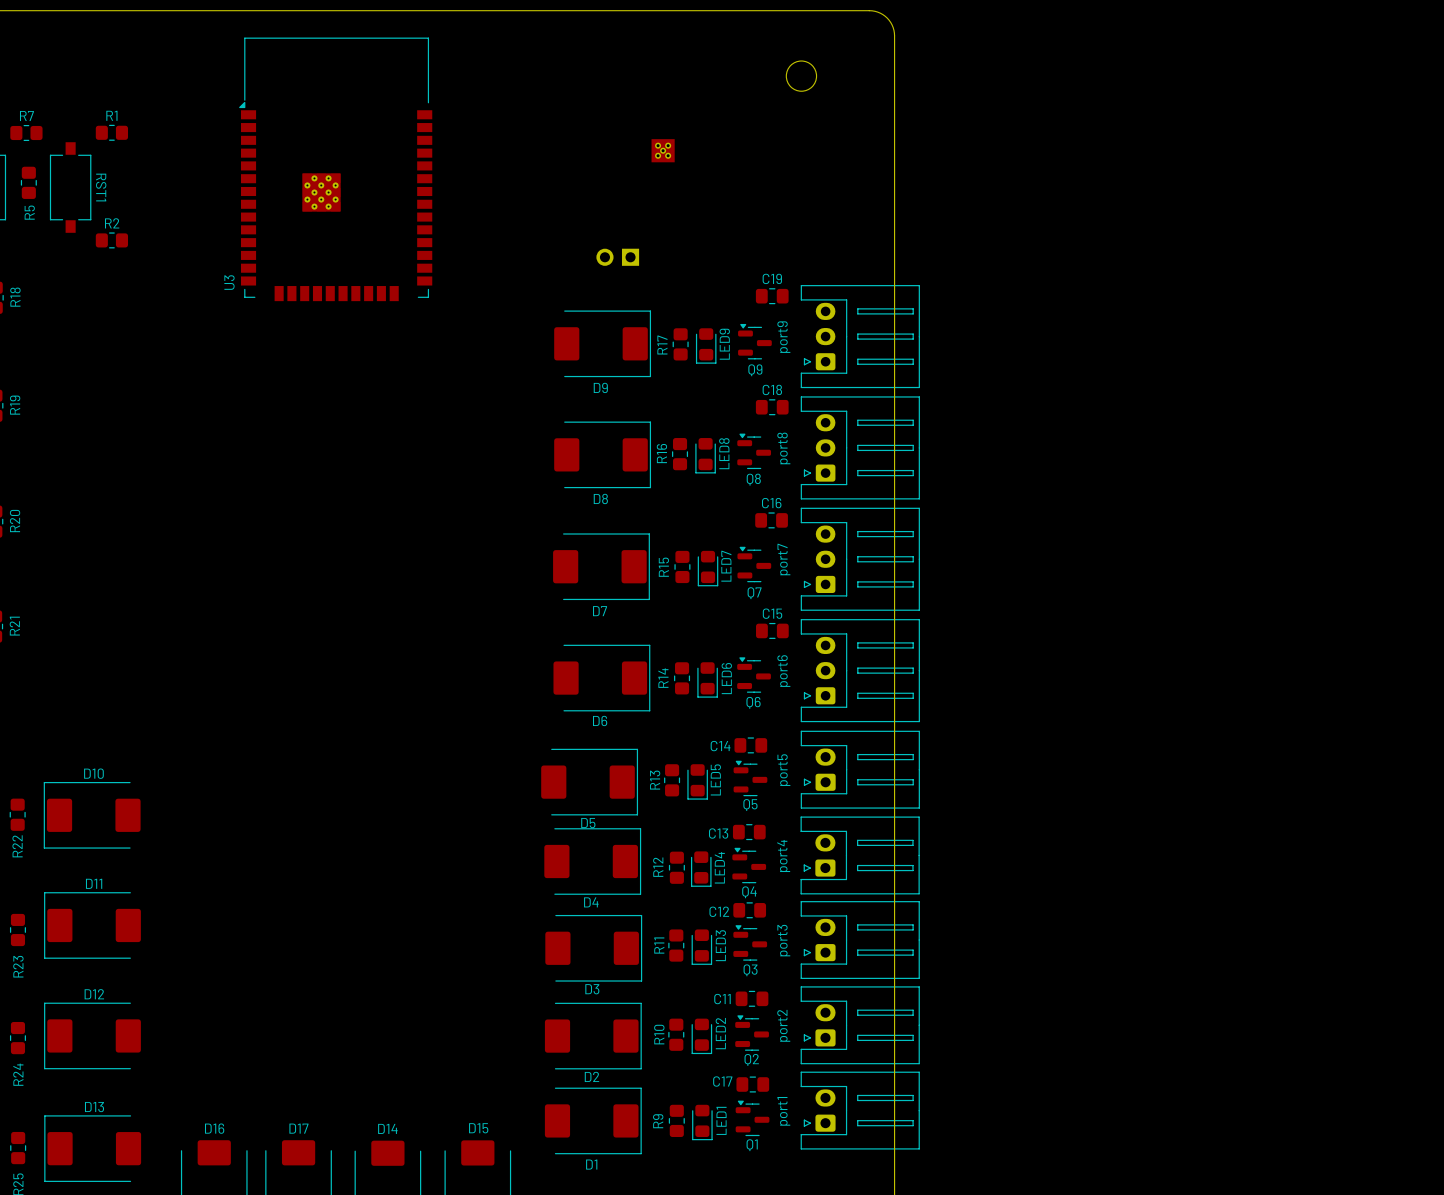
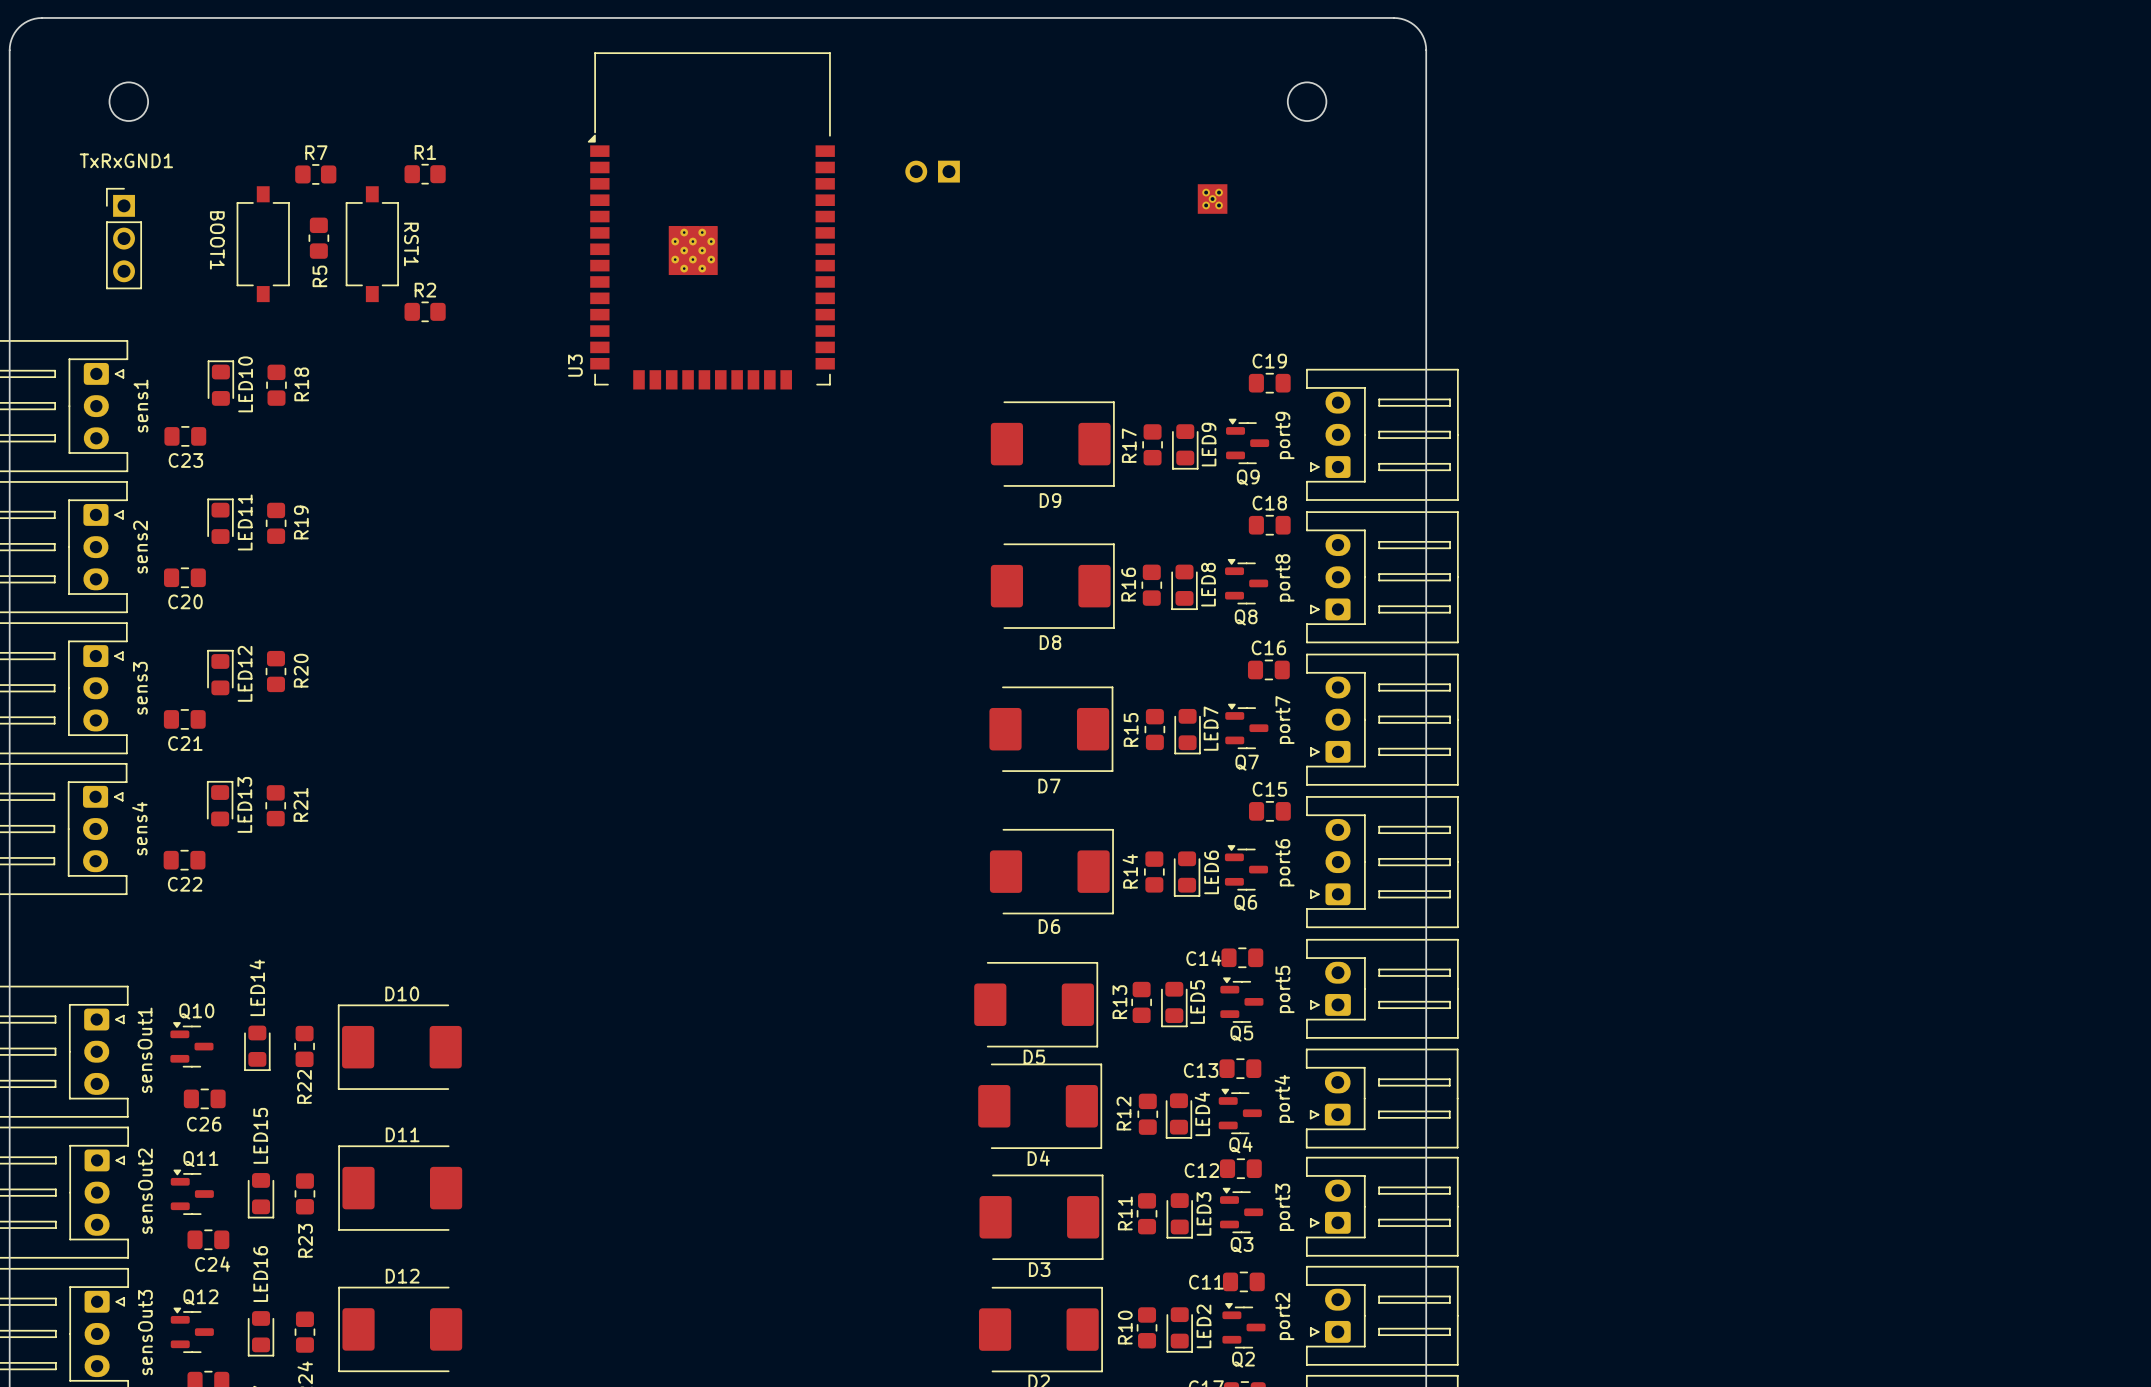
part position: (663, 150) -> (1212, 199)
part position: (617, 257) -> (932, 171)

